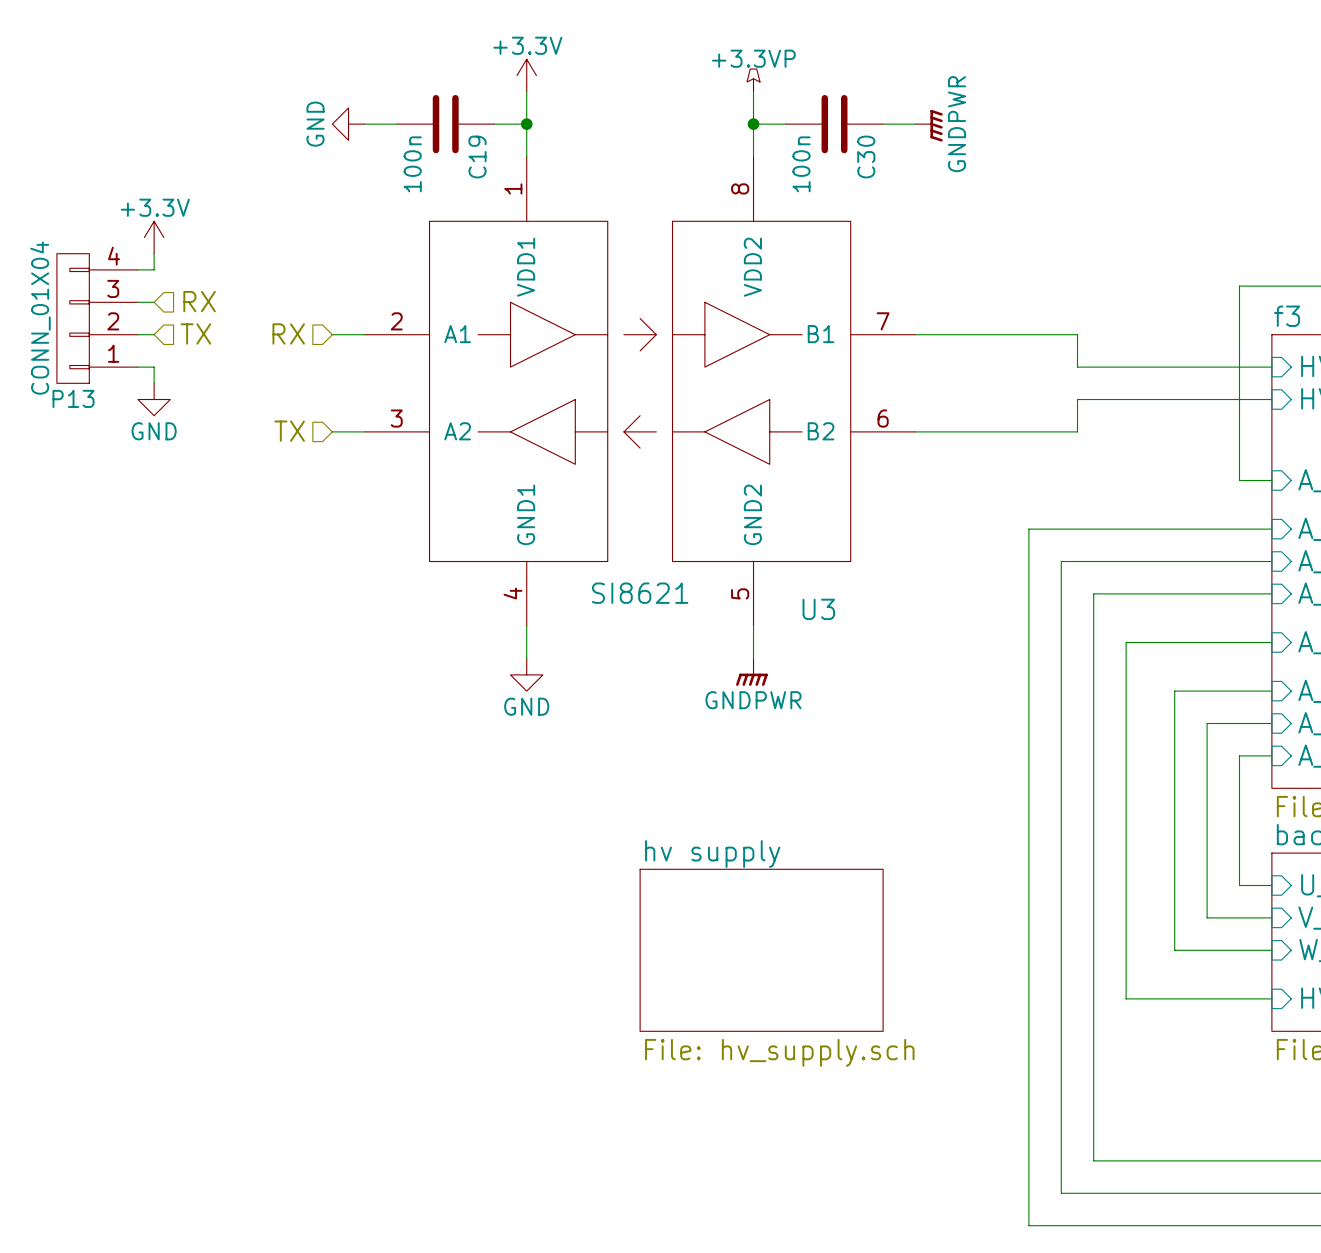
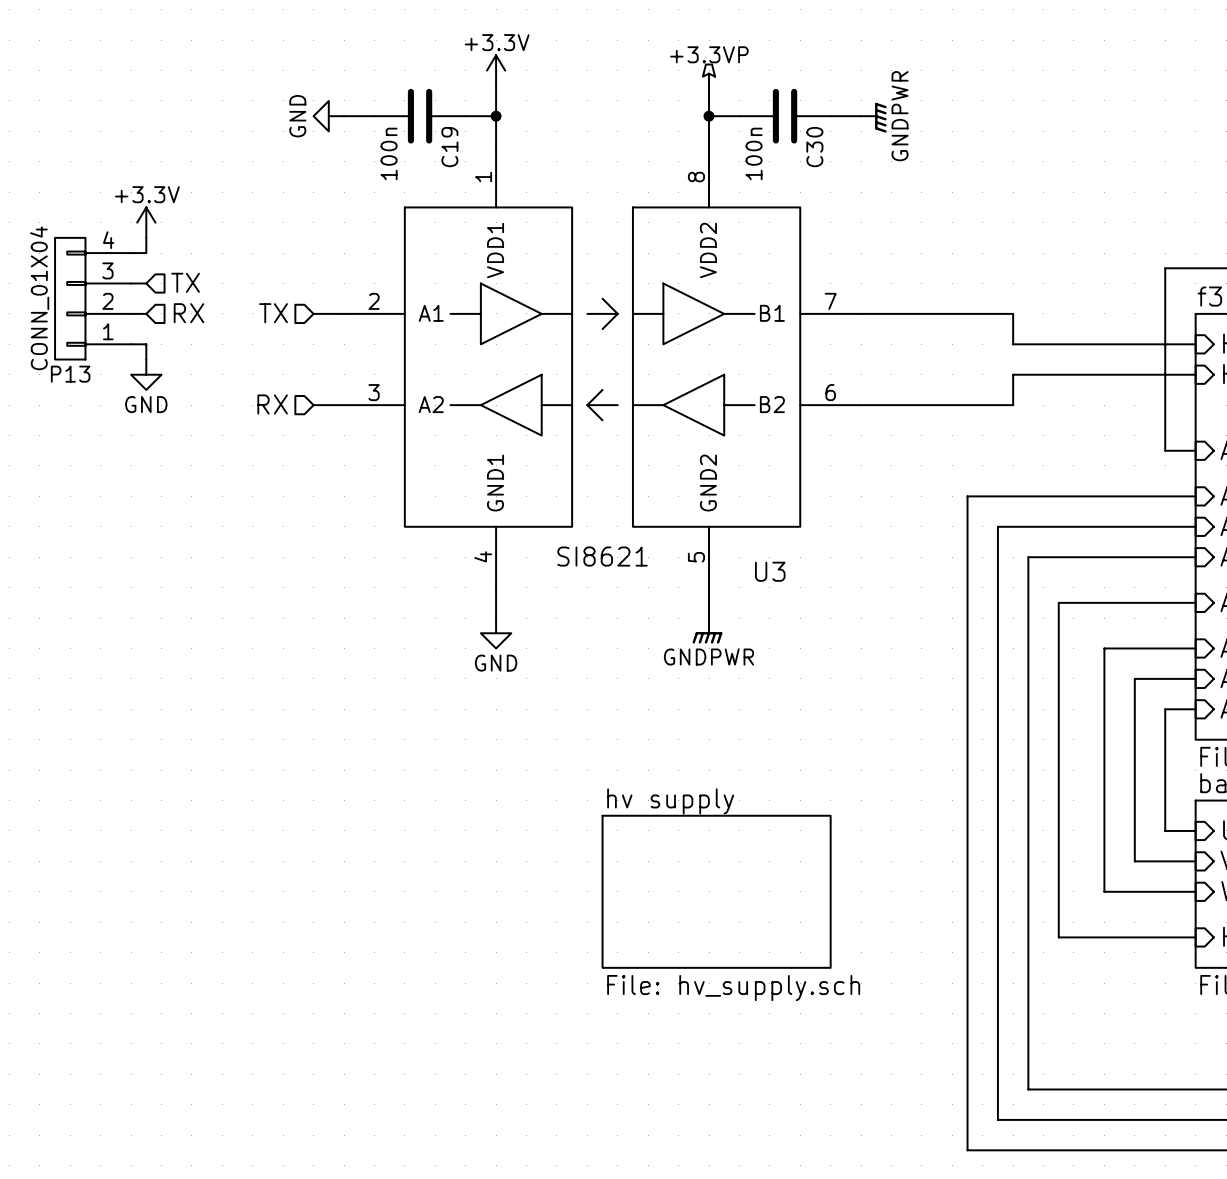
hierarchical label: RX (199, 301) -> TX (185, 282)
hierarchical label: TX (195, 333) -> RX (189, 313)
hierarchical label: RX (288, 333) -> TX (273, 313)
hierarchical label: TX (289, 431) -> RX (272, 404)

